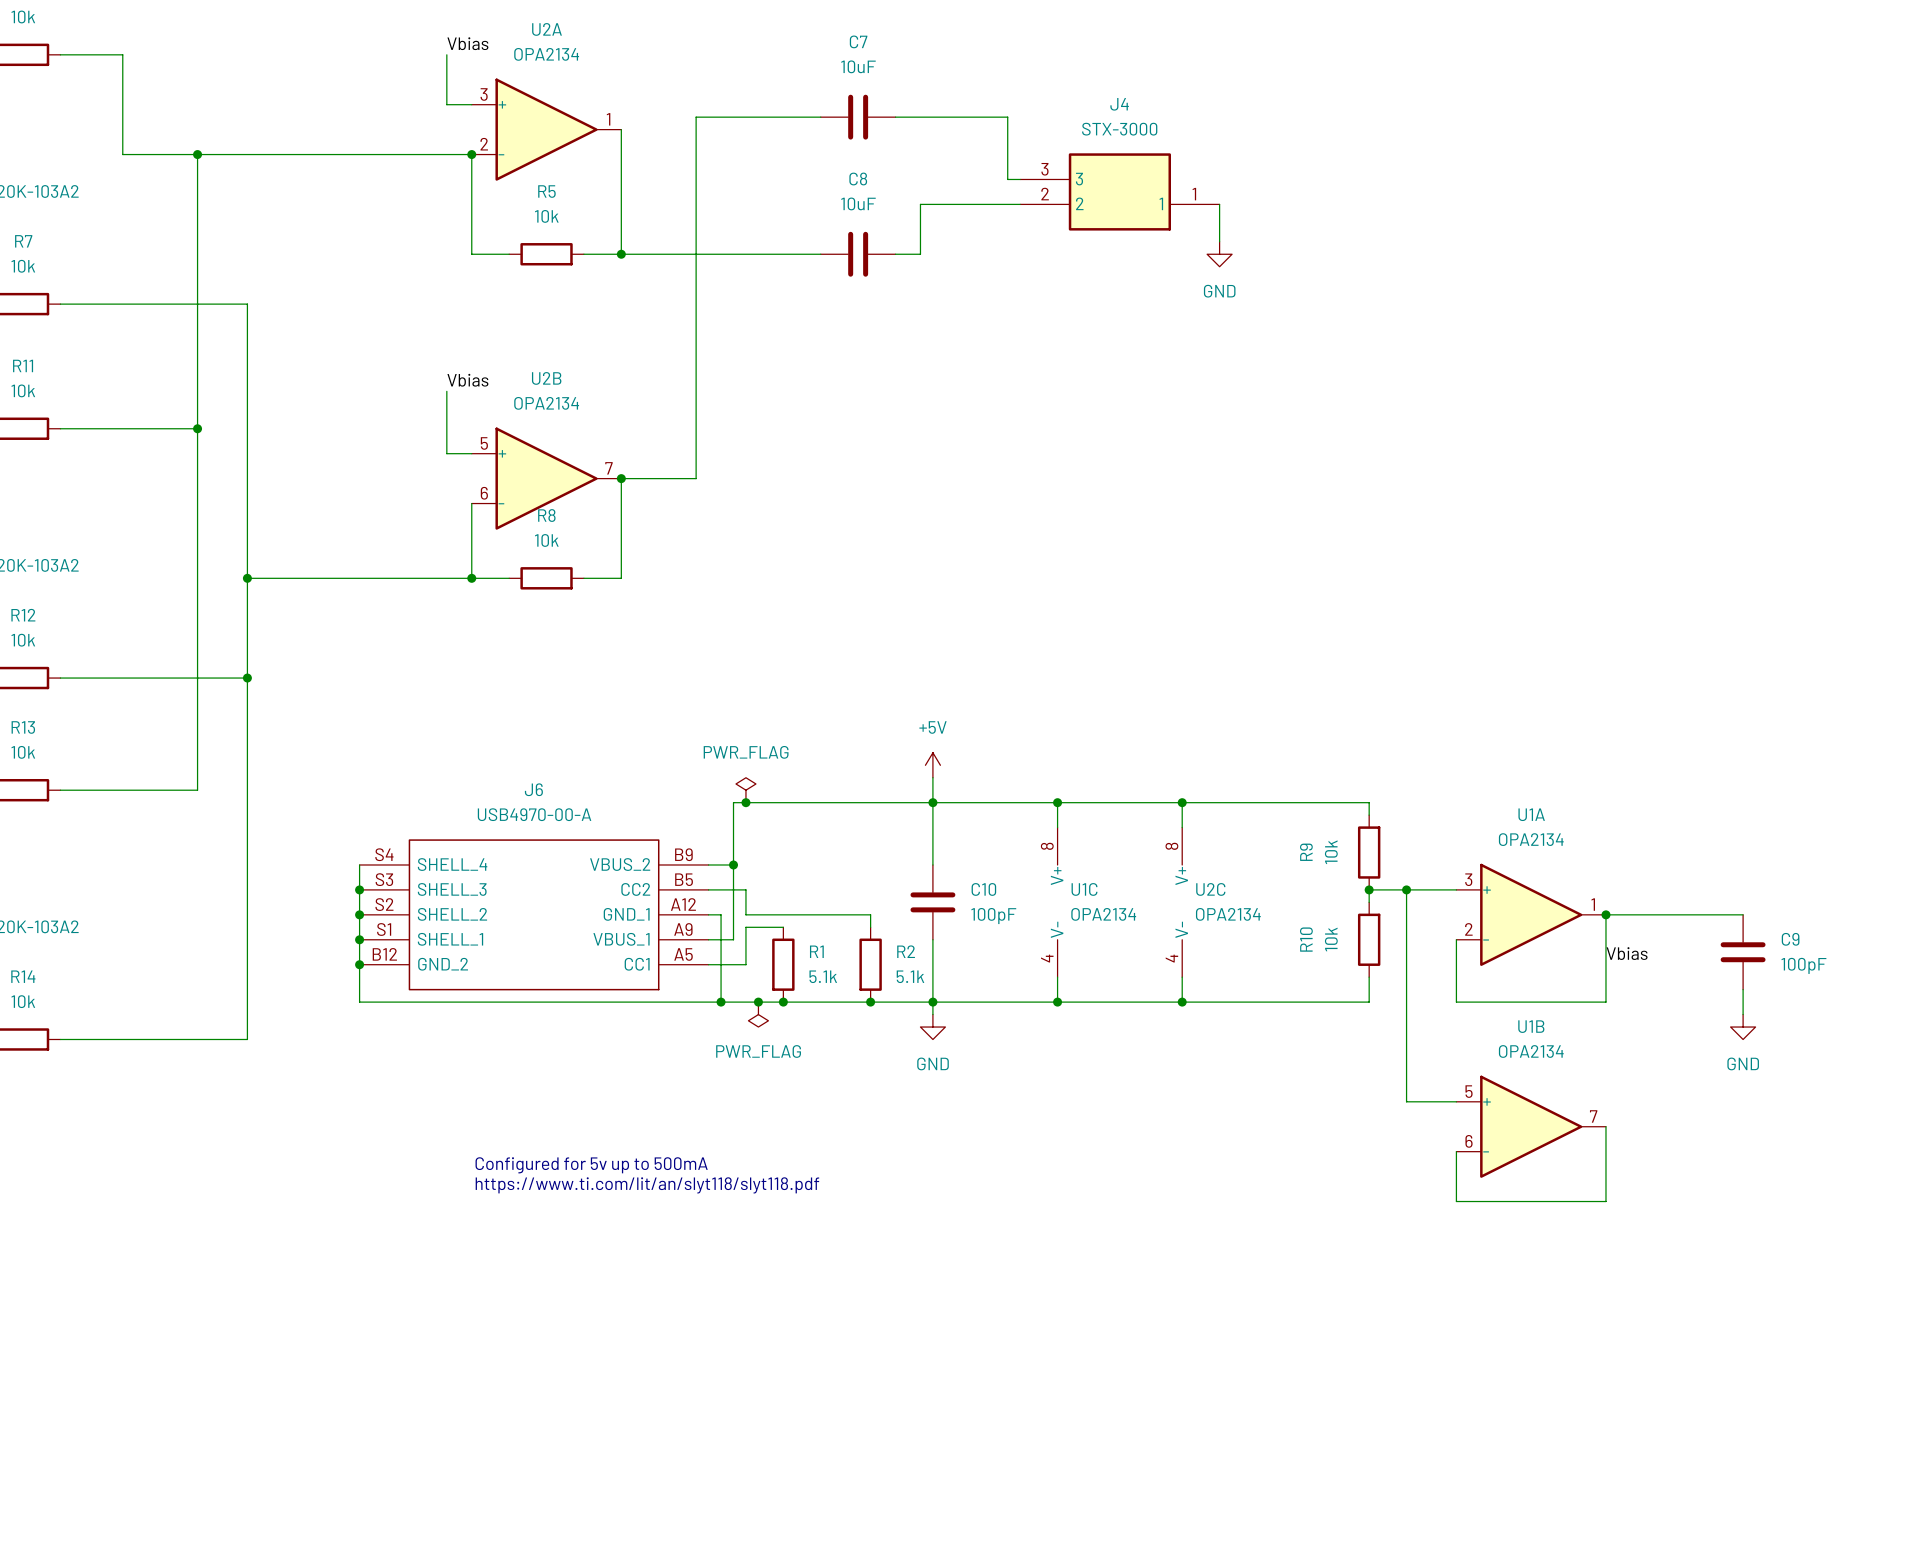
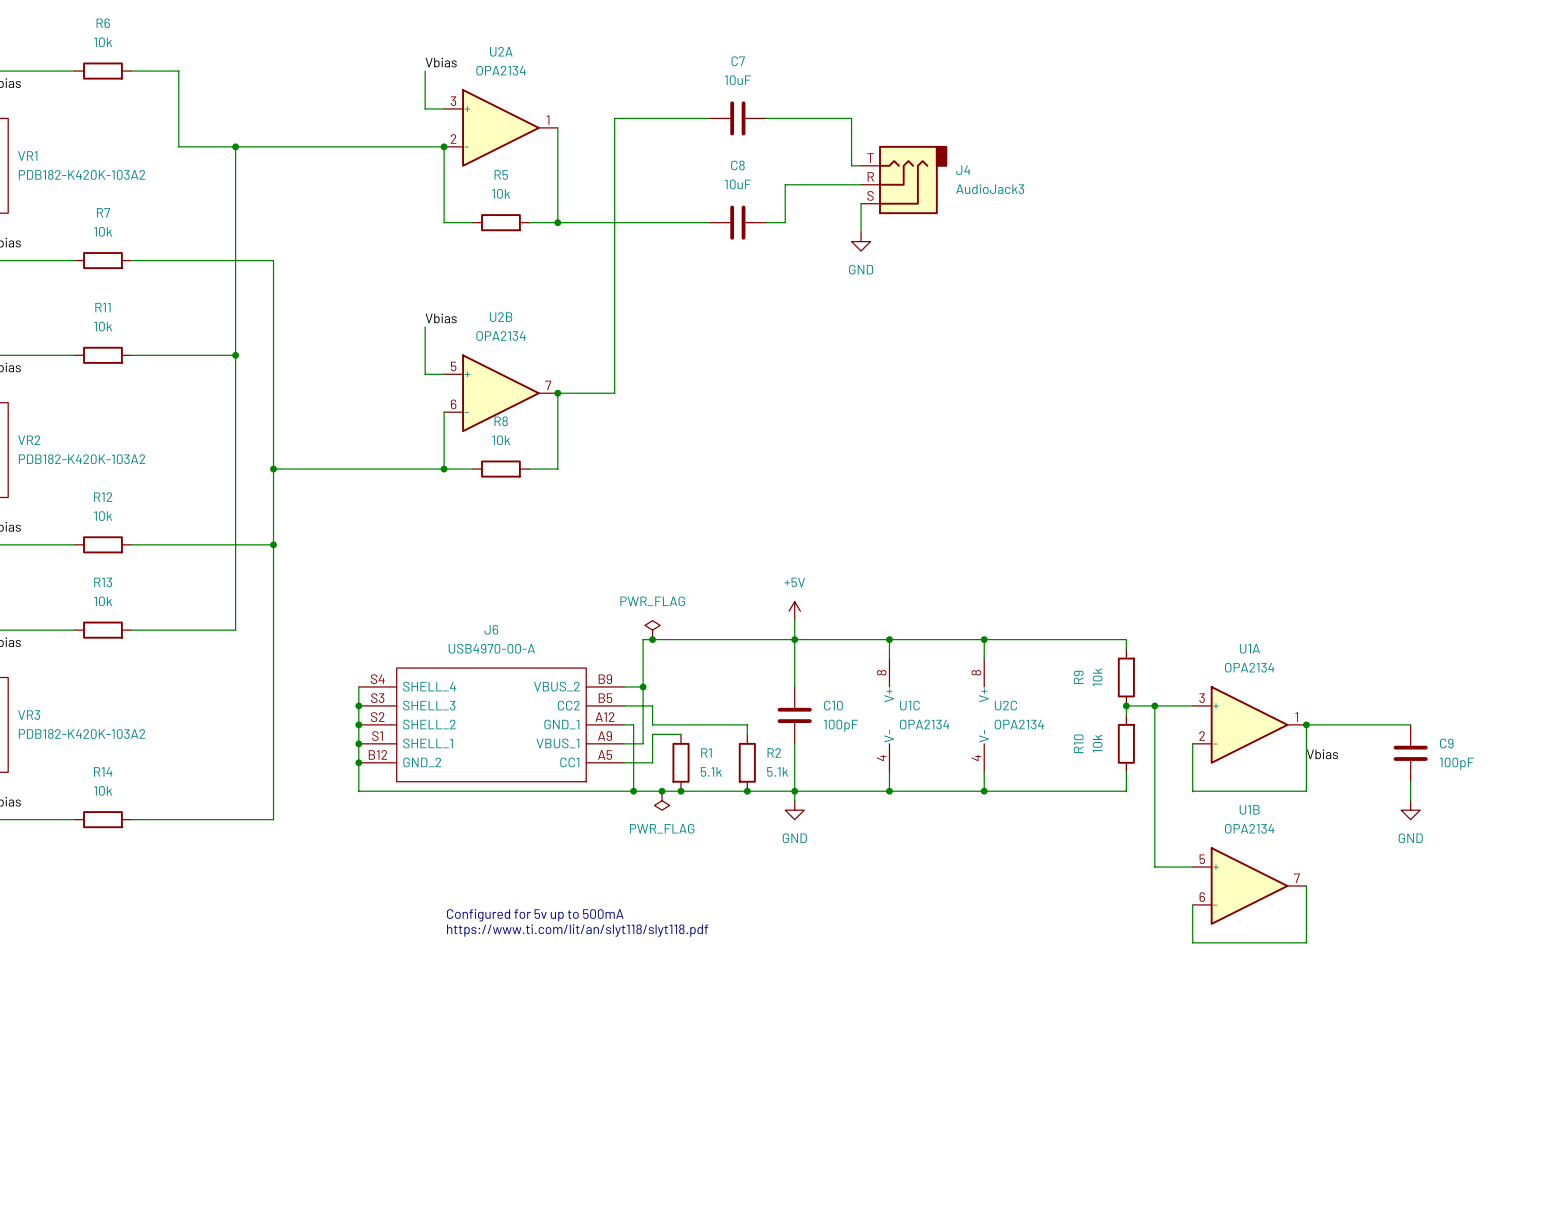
J4 name position: J4 (1119, 104) -> J4 (963, 170)
J4 value: STX-3000 (1119, 129) -> AudioJack3 (990, 189)
J4 symbol: [1020, 153, 1220, 231] -> [861, 145, 948, 215]
wire: (1219, 204) (1219, 241) -> (861, 203) (861, 232)
power symbol position: GND (1219, 254) -> GND (861, 241)

